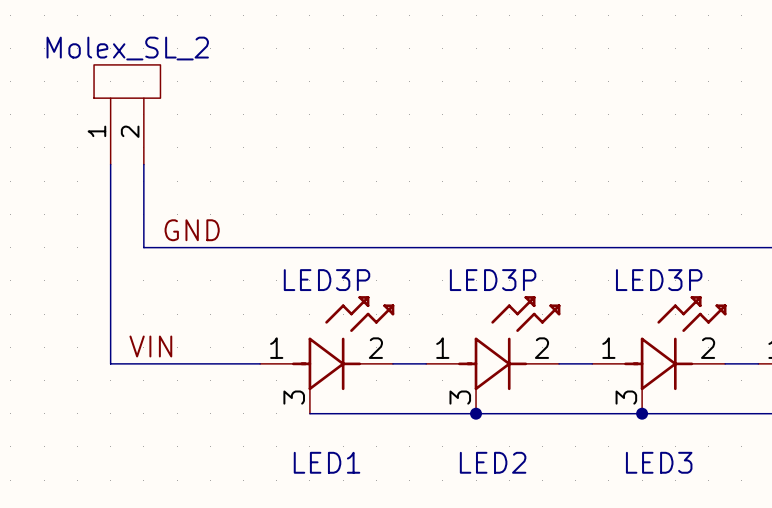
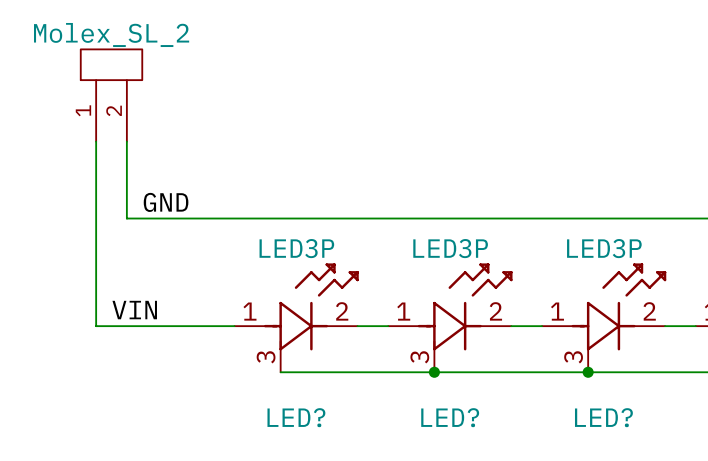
LED1 name: LED1 (327, 462) -> LED? (296, 417)
LED2 name: LED2 (493, 462) -> LED? (450, 417)
LED3 name: LED3 (659, 462) -> LED? (603, 417)

